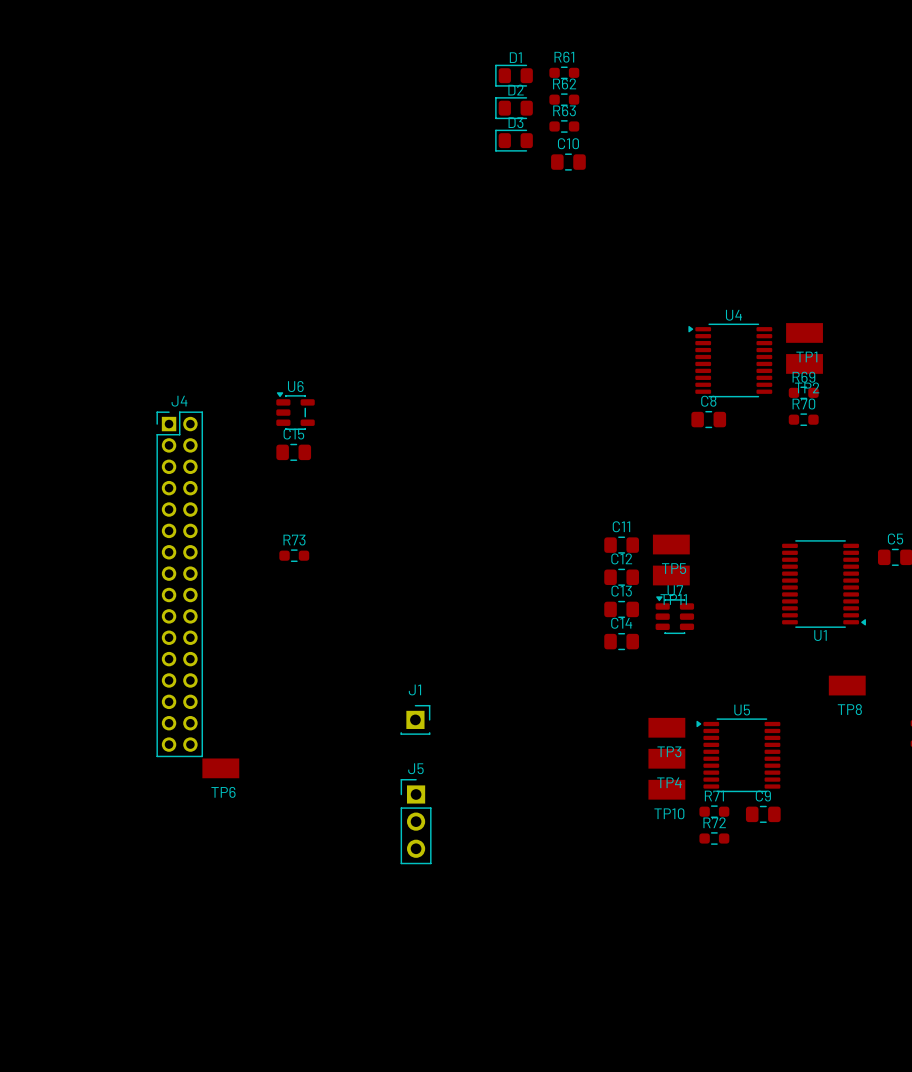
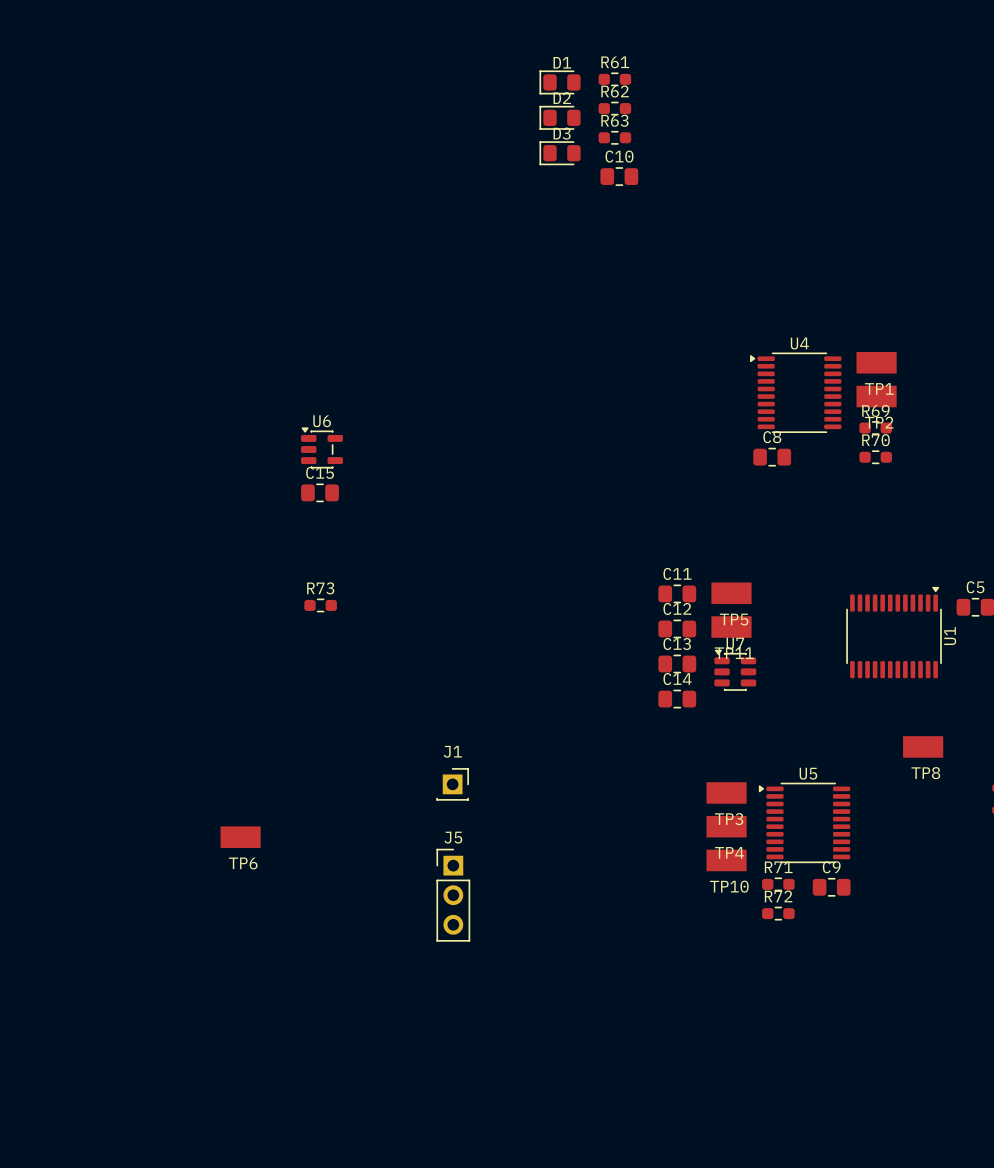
J4: (179, 584) -> none
U1 rotation: 0° (824, 584) -> 90° counterclockwise (894, 632)

